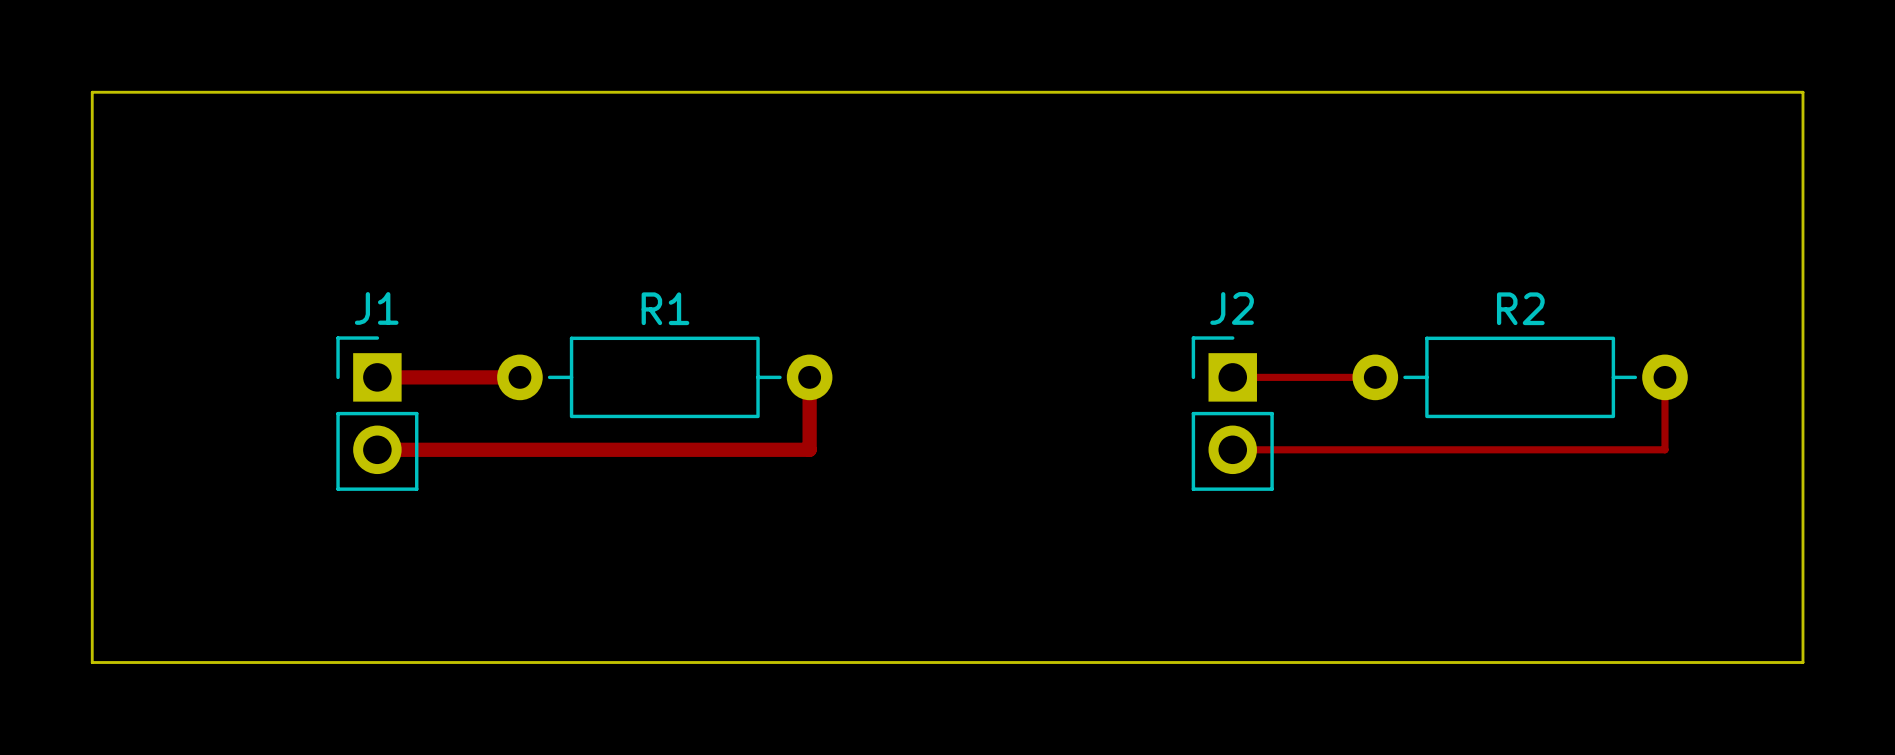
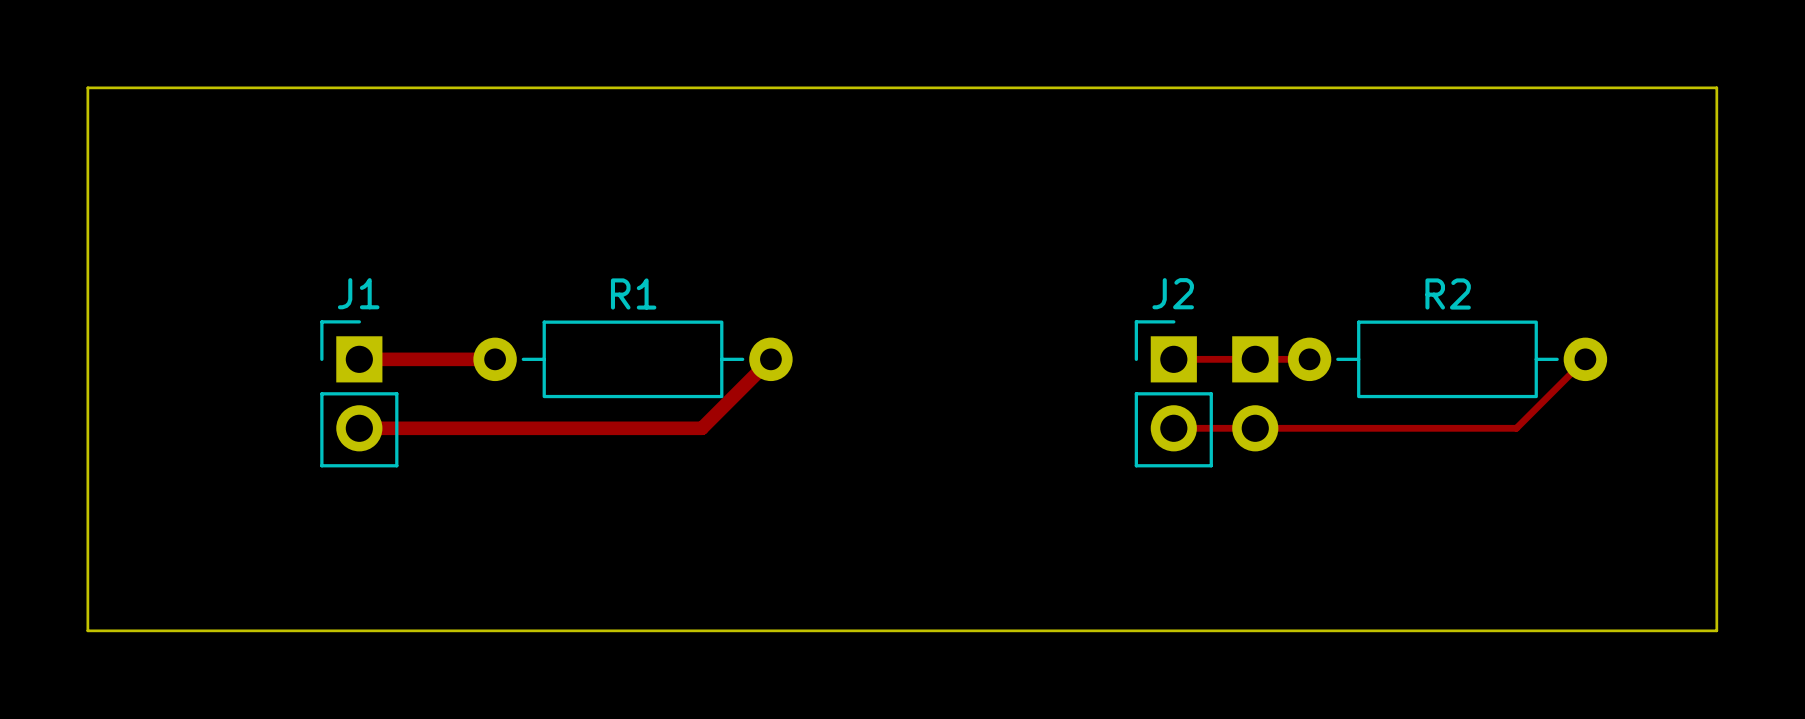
track: (809, 377) (809, 449) (737, 449) -> (770, 359) (701, 428)
track: (1664, 377) (1664, 449) (1592, 449) -> (1585, 359) (1516, 428)
part: none -> (1255, 393)

